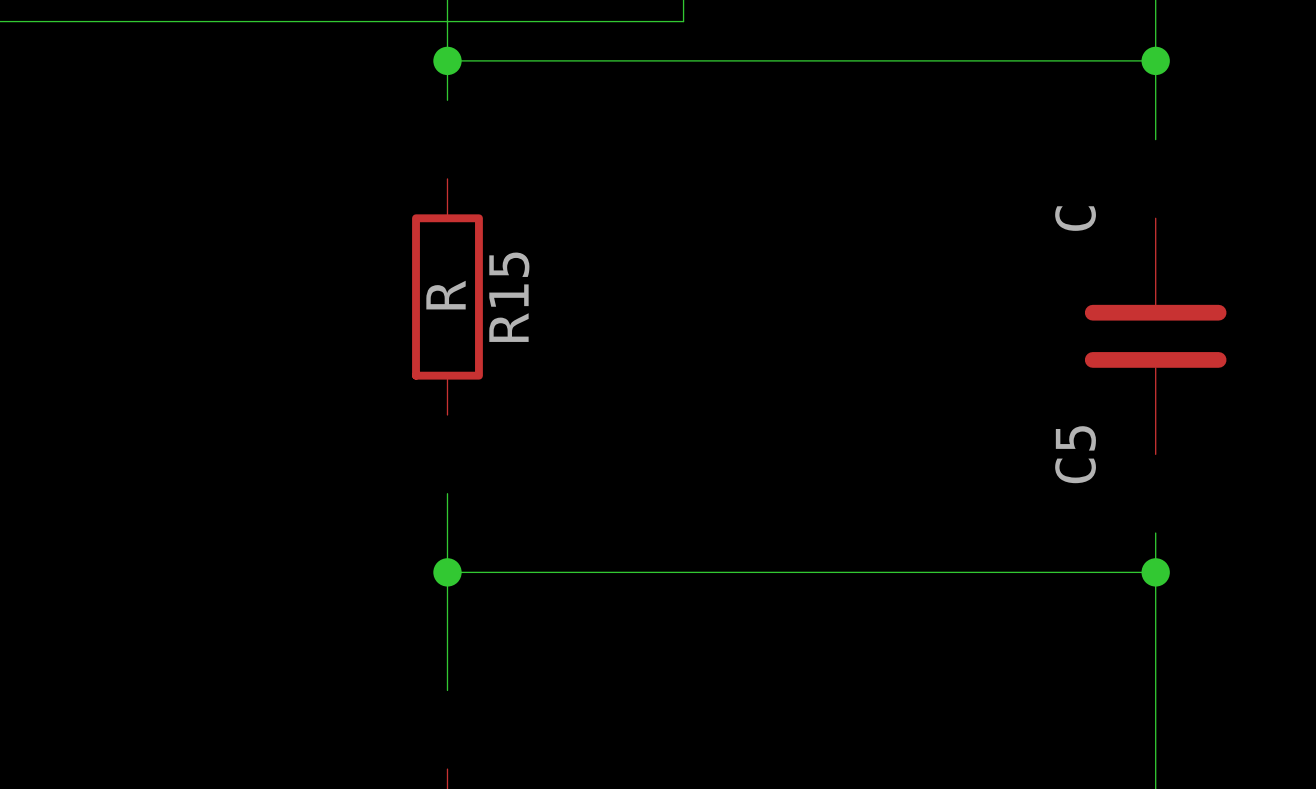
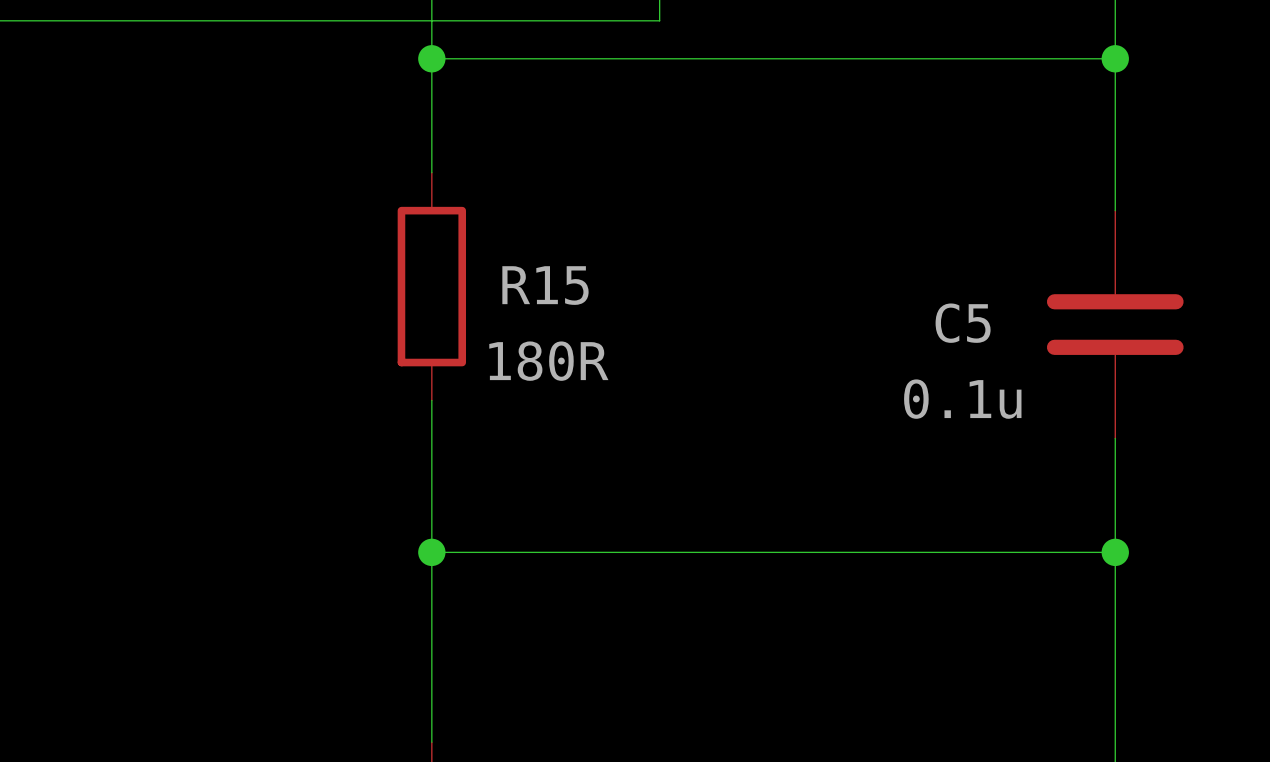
wire: none -> (431, 96) (431, 172)
wire: none -> (1115, 134) (1115, 210)
C5 value: C (1075, 218) -> 0.1u (962, 399)
R15 value: R (446, 295) -> 180R (548, 361)
R15 name rotation: 0° (509, 297) -> 90° clockwise (545, 285)
wire: none -> (431, 400) (431, 476)
C5 name rotation: 0° (1075, 454) -> 90° clockwise (963, 323)
C5 name position: C5 (1075, 454) -> C5 (963, 323)
wire: none -> (1115, 438) (1115, 514)
wire: none -> (431, 666) (431, 742)

